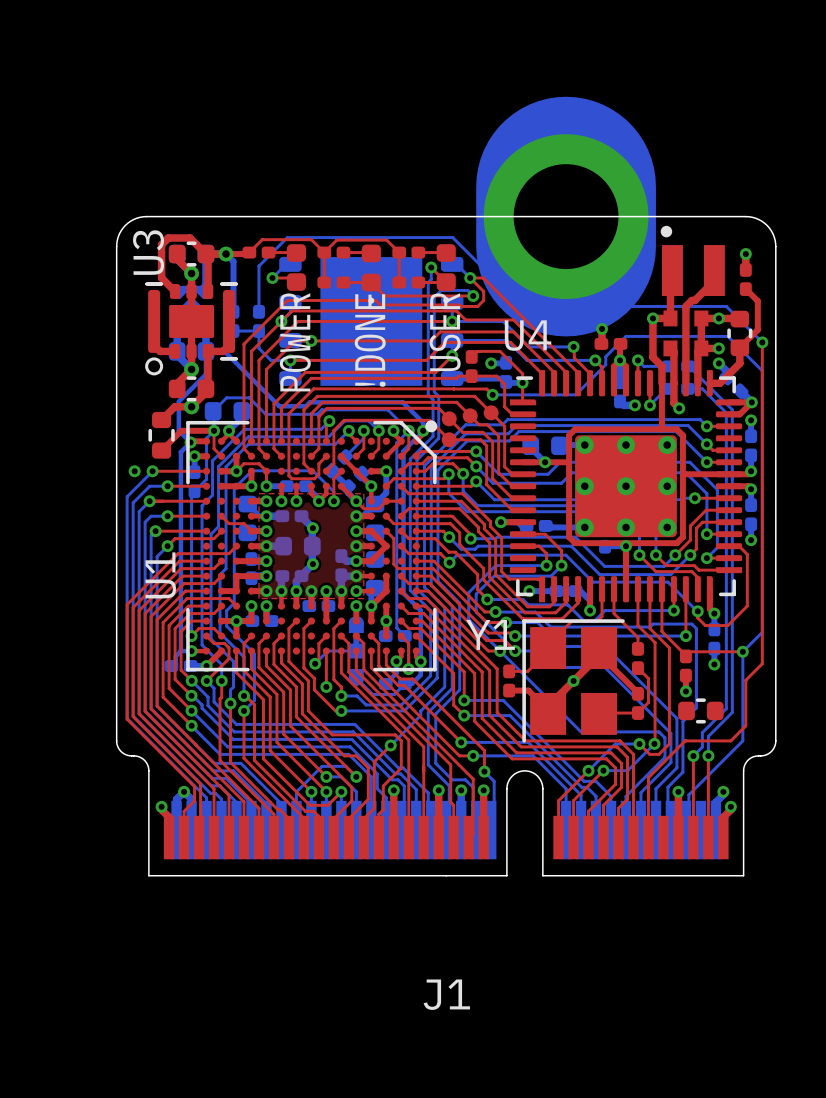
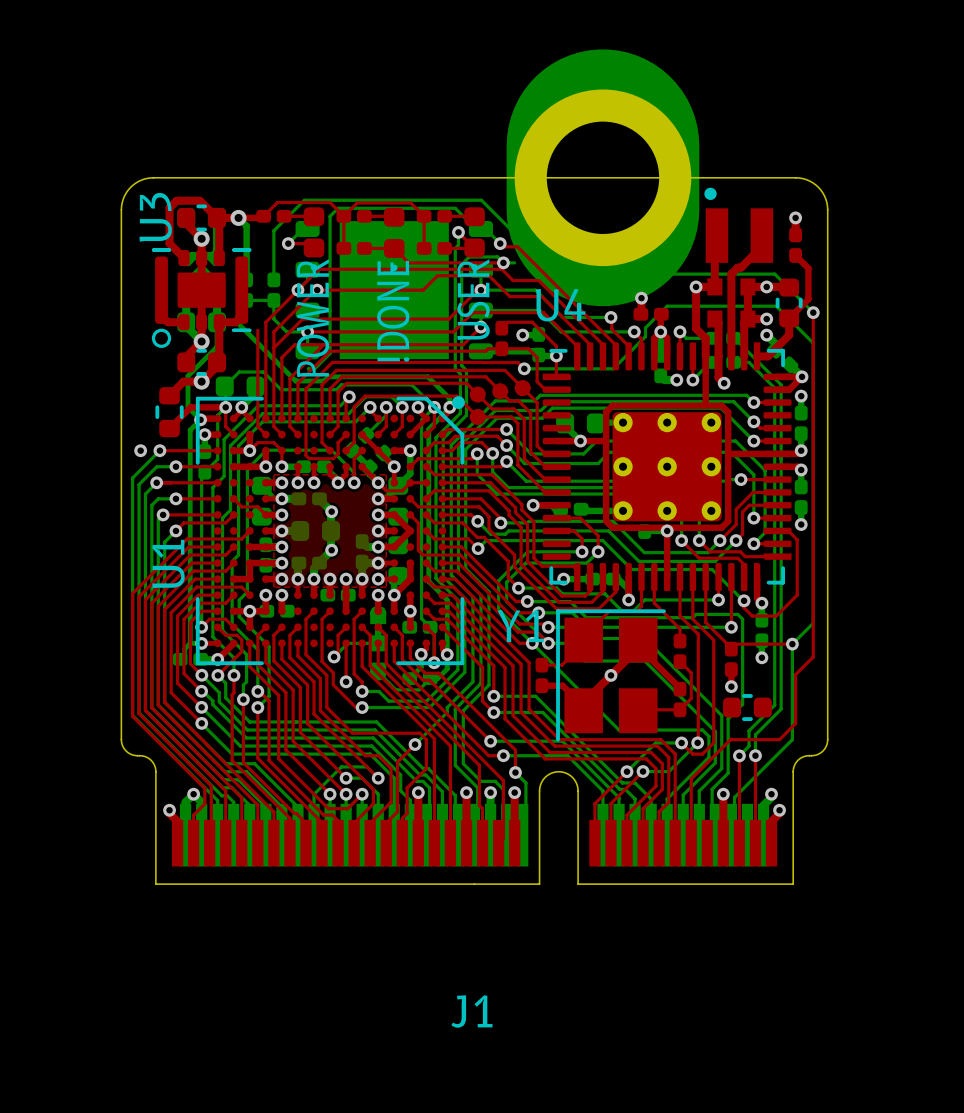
bottom track: none -> (480, 229) (475, 229) (455, 208) (338, 208) (330, 216) (330, 353) (314, 368) (308, 368)
top track: (486, 281) (483, 278) (470, 278) (483, 291) (483, 300) (477, 306) (380, 304) (375, 300) (287, 300) (244, 344) (244, 358) -> (517, 246) (503, 246)
bottom track: none -> (503, 262) (514, 262)
top track: (291, 310) (456, 310) (465, 319) (513, 319) -> (309, 278) (318, 269) (501, 269) (513, 280) (538, 280) (546, 288)
top track: none -> (480, 286) (448, 319) (302, 319) (273, 347)
top track: (398, 321) (452, 321) -> (423, 290) (437, 275) (488, 275) (509, 296) (541, 296) (546, 301)
top track: (513, 331) (440, 331) (431, 340) (295, 340) (266, 369) (266, 384) -> (323, 344) (294, 344) (281, 357)
via position: (311, 340) -> (317, 290)

